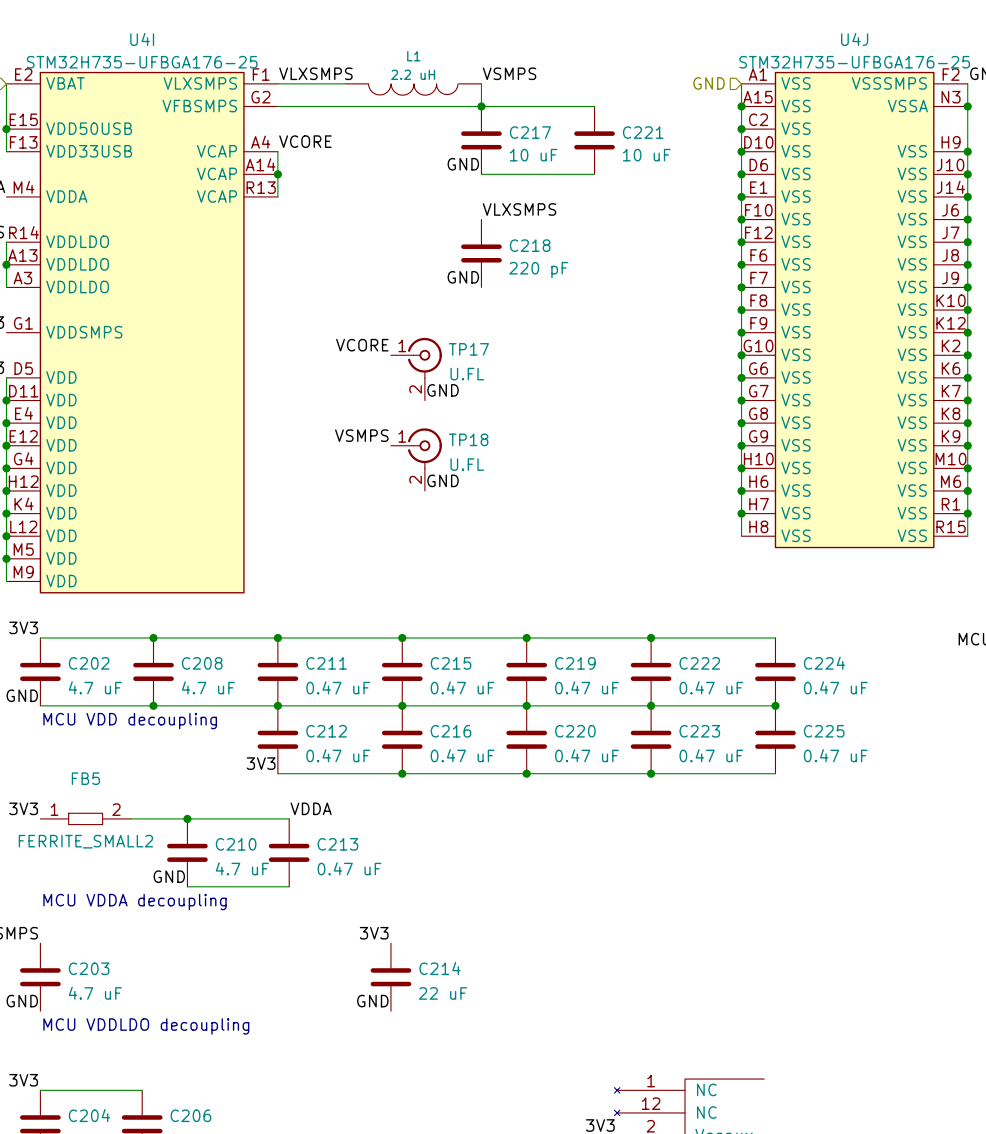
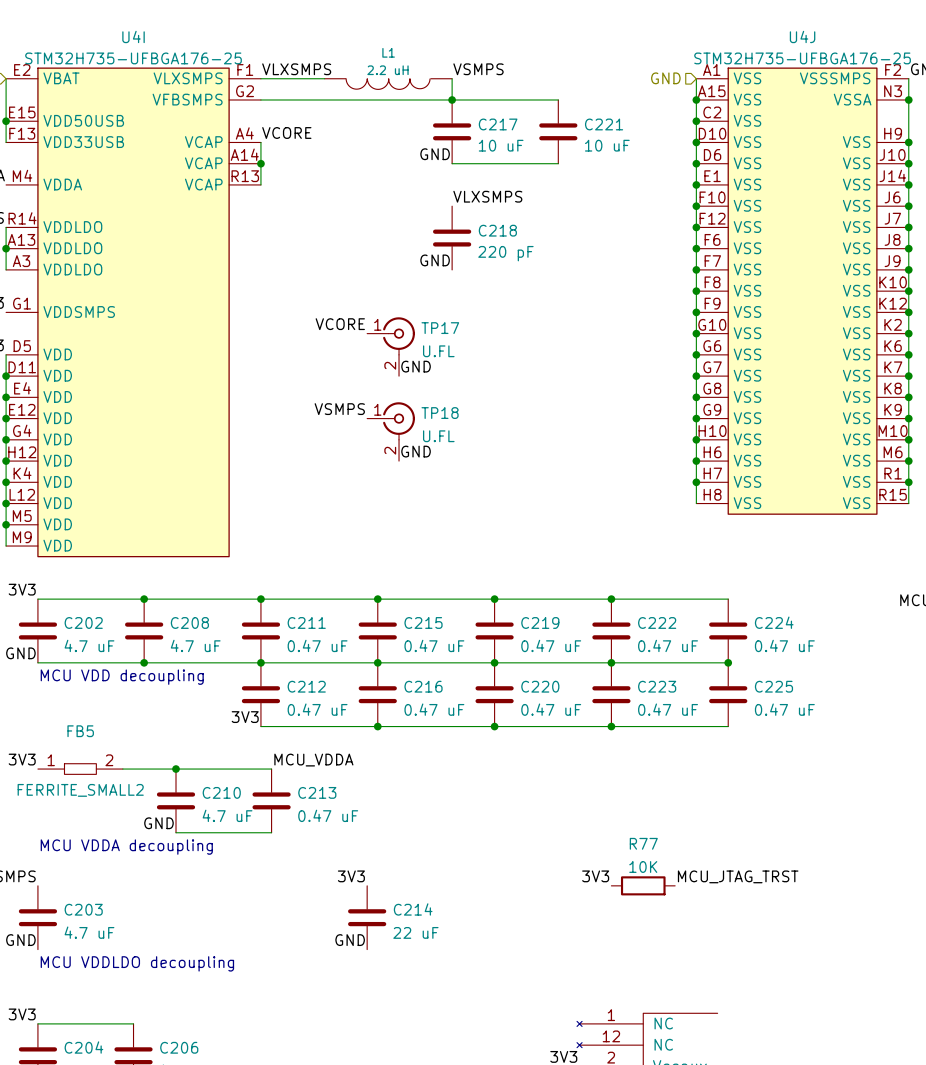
label: VDDA (311, 808) -> MCU_VDDA (313, 760)
label: none -> 3V3 (595, 876)
label: none -> MCU_JTAG_TRST (738, 876)
R77: none -> 10K (643, 885)

